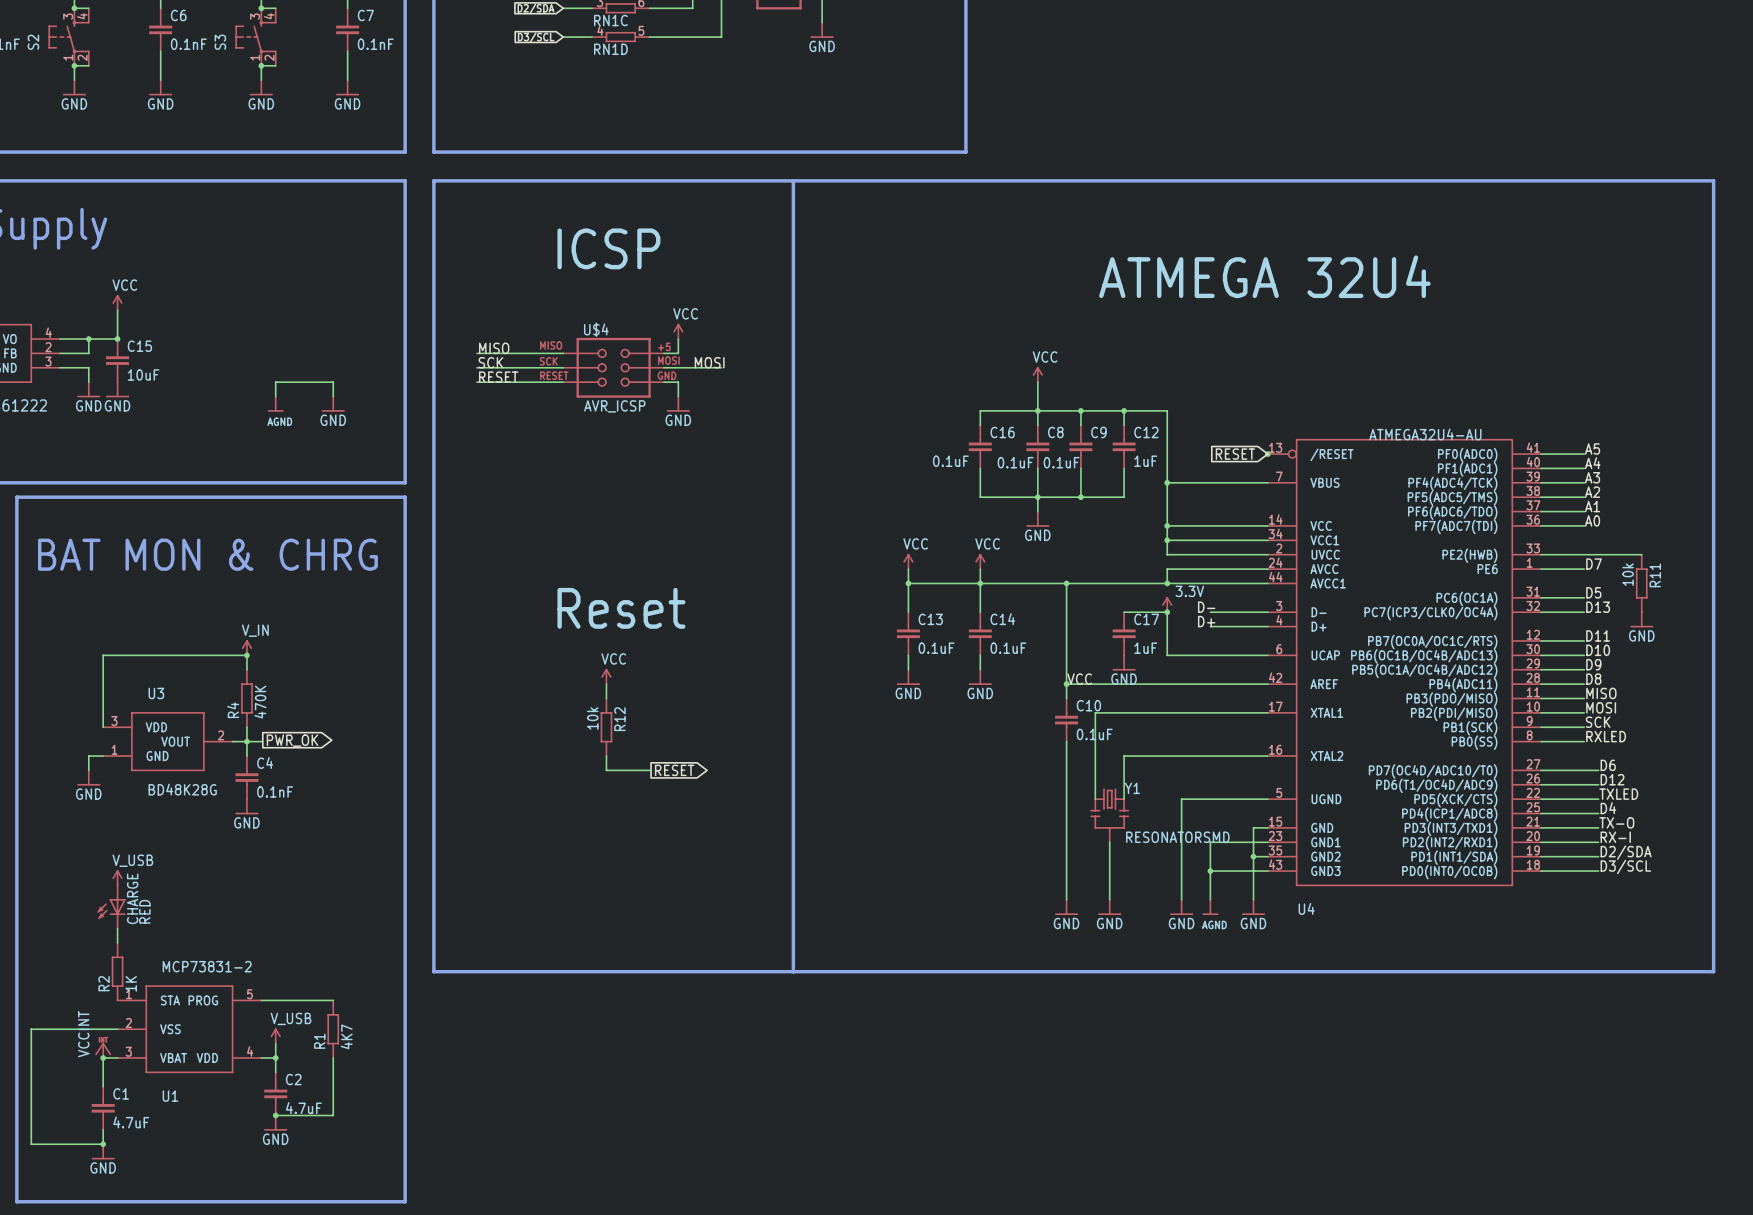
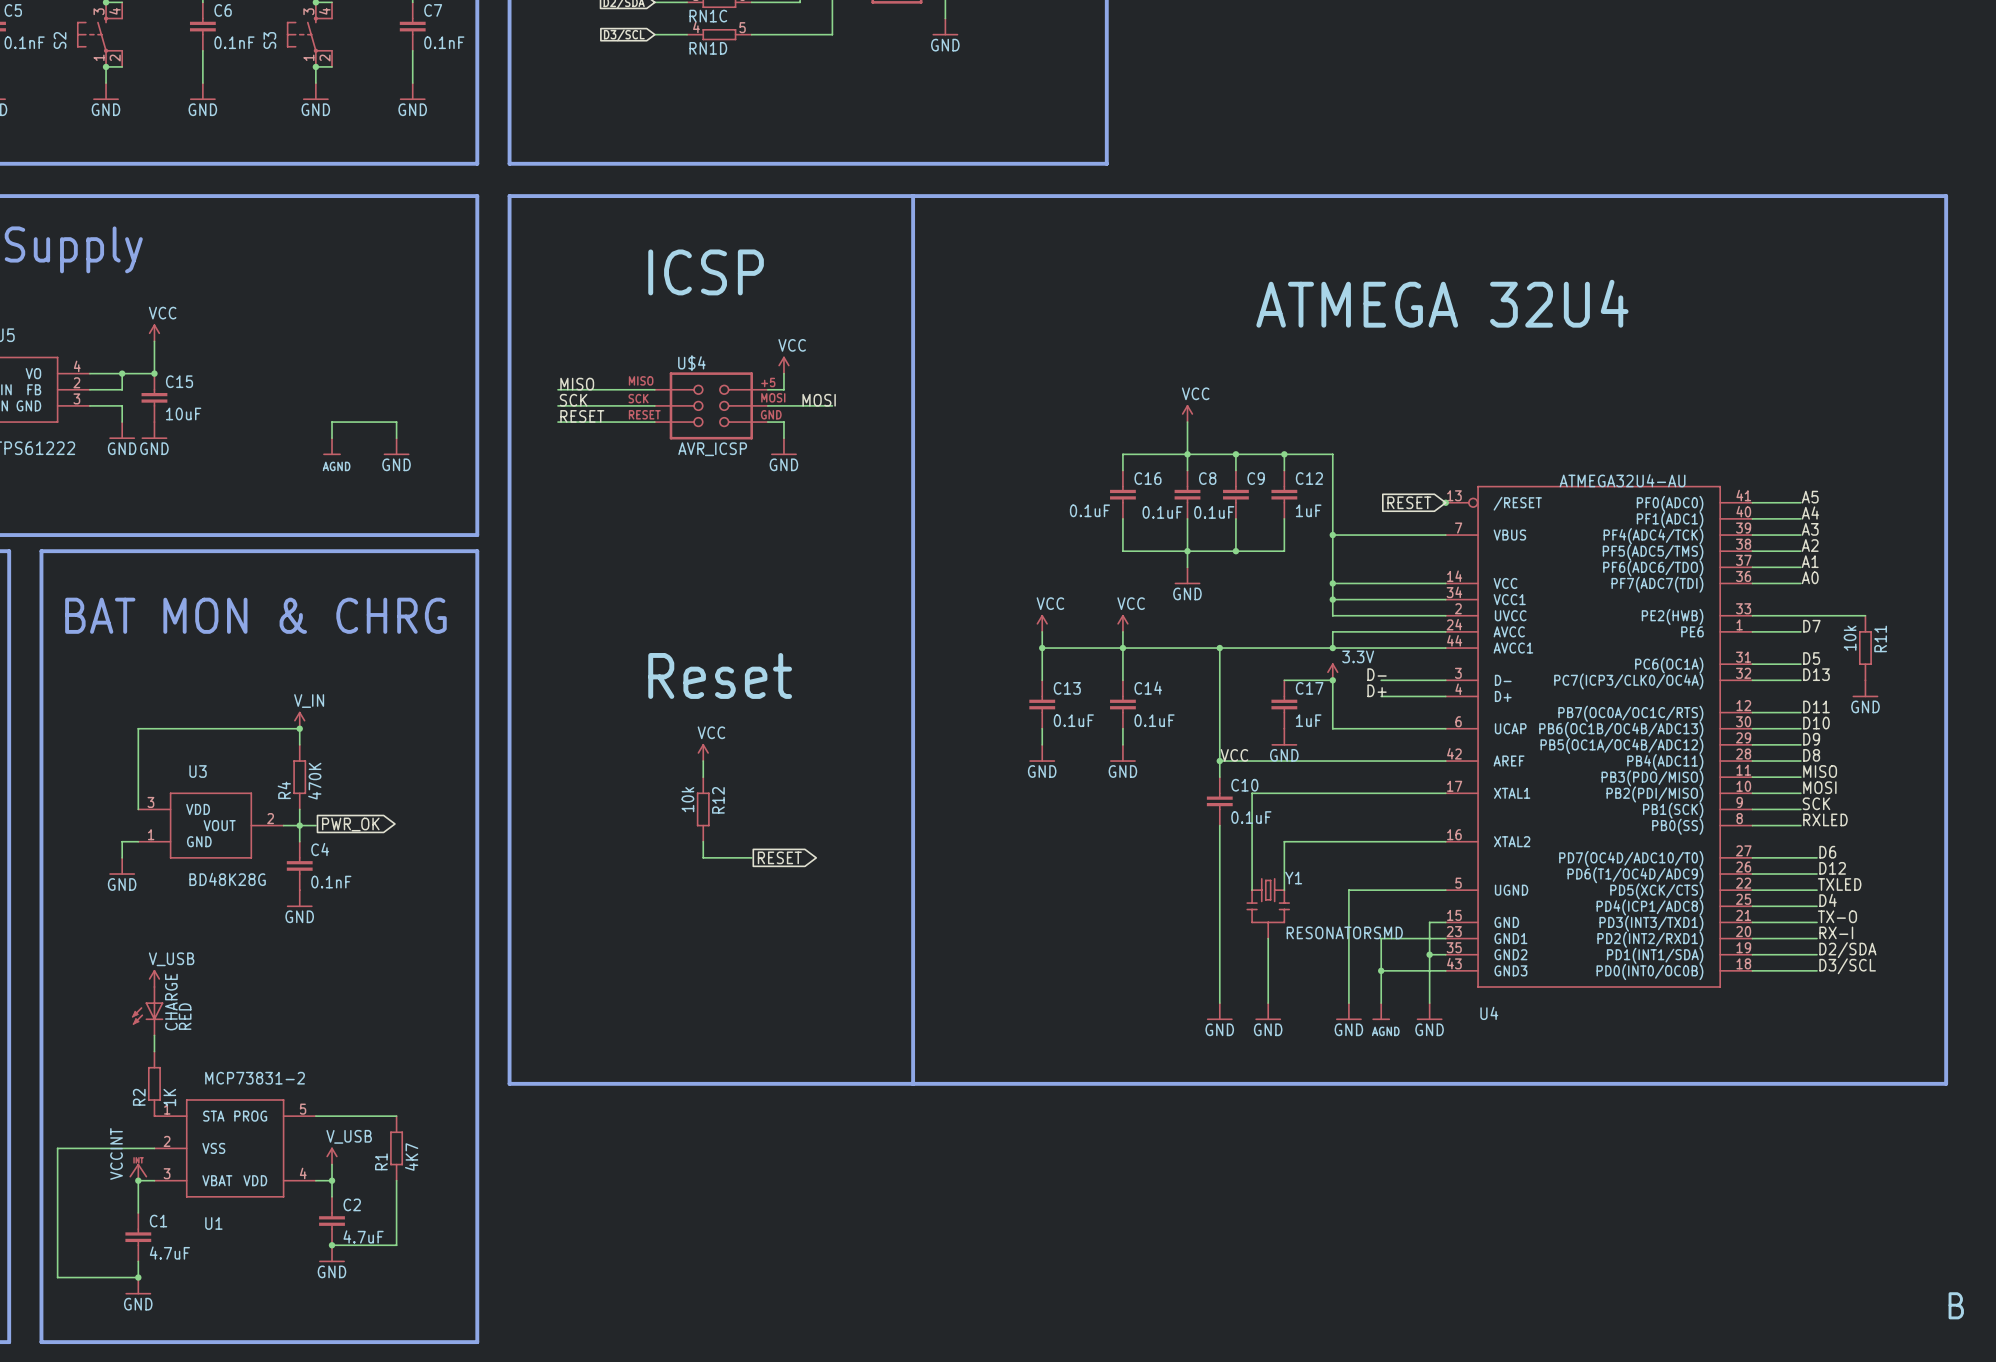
text: none -> B (1956, 1305)

